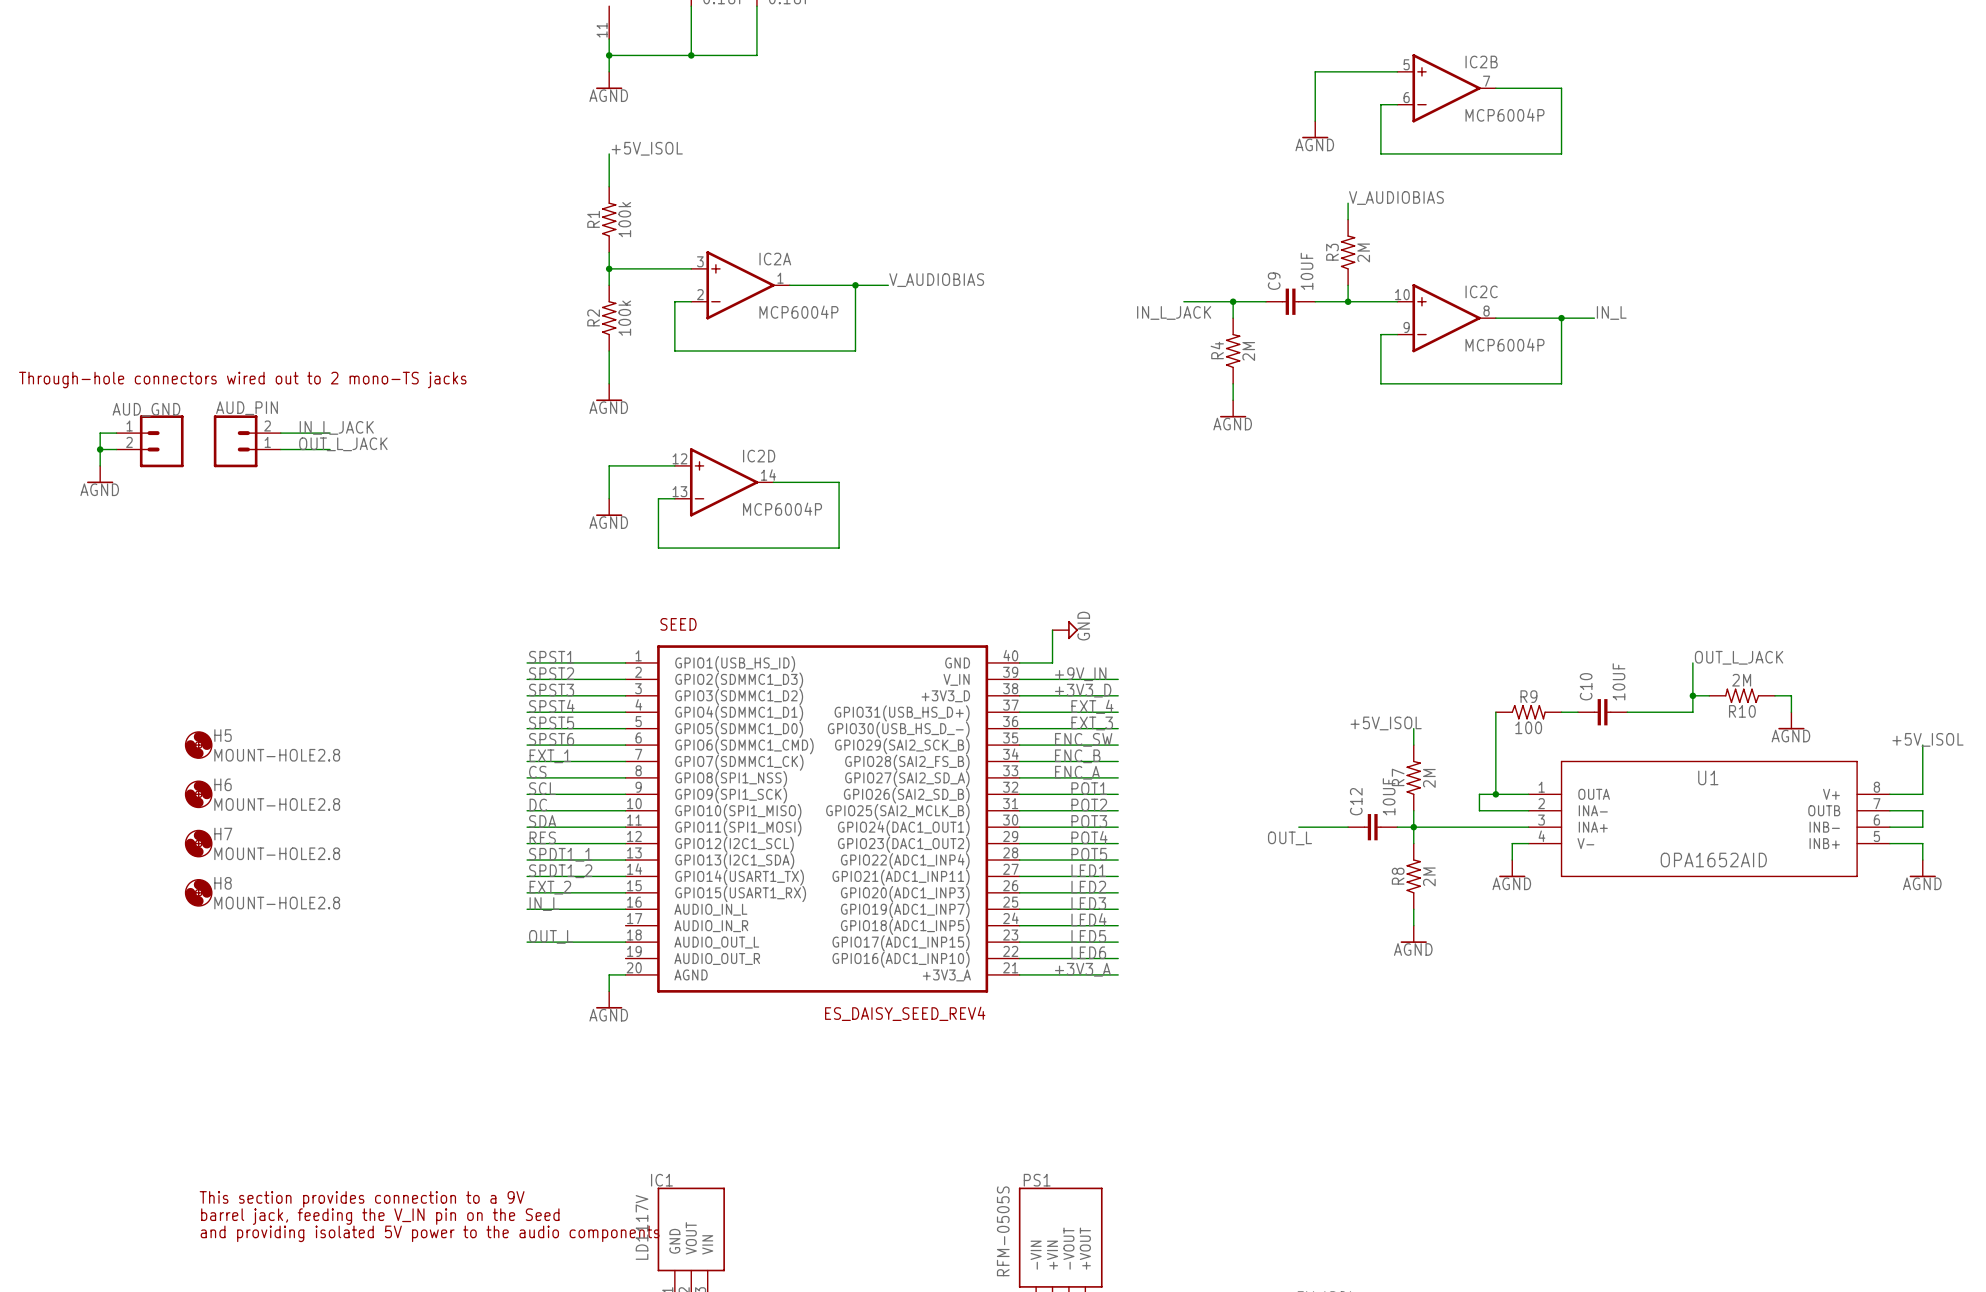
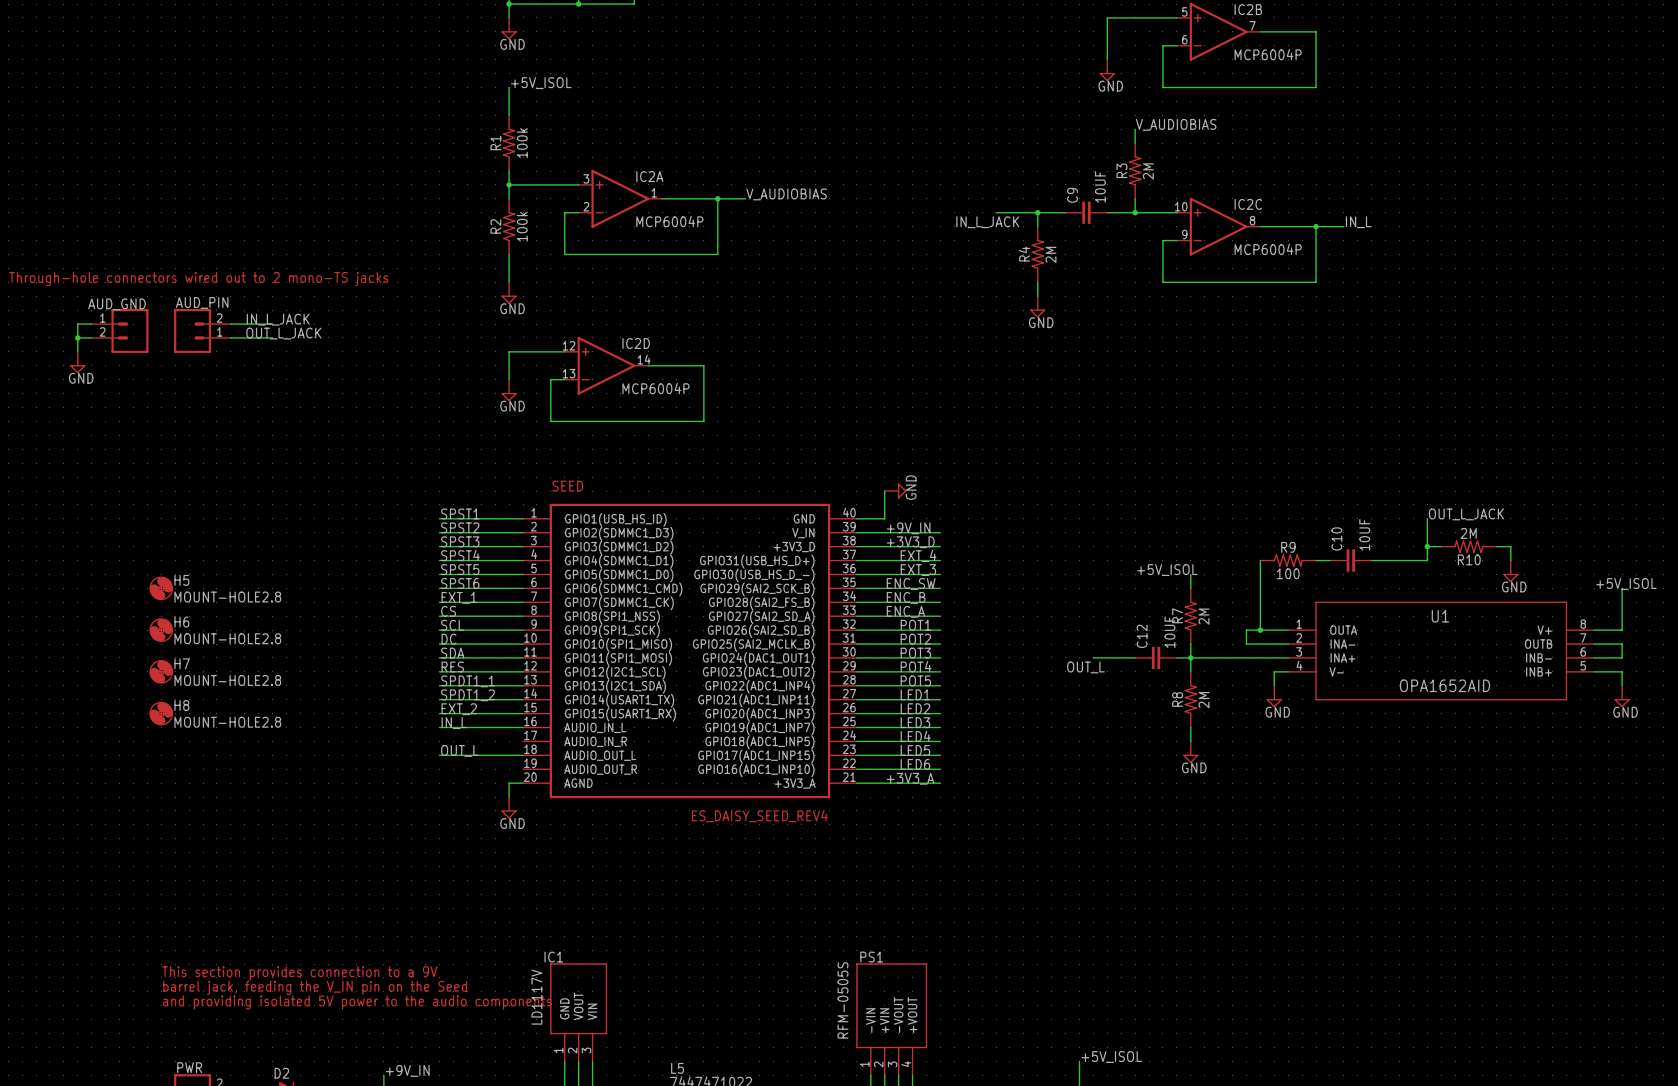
power symbol: AGND (609, 80) -> GND (509, 28)
power symbol: AGND (1315, 129) -> GND (1107, 70)
power symbol: AGND (609, 392) -> GND (509, 293)
power symbol: AGND (1233, 408) -> GND (1037, 307)
power symbol: AGND (100, 474) -> GND (77, 362)
power symbol: AGND (609, 507) -> GND (509, 390)
power symbol: AGND (1791, 720) -> GND (1510, 571)
power symbol: AGND (1512, 868) -> GND (1274, 696)
power symbol: AGND (1922, 868) -> GND (1622, 696)
power symbol: AGND (1413, 934) -> GND (1190, 752)
power symbol: AGND (609, 999) -> GND (509, 807)

